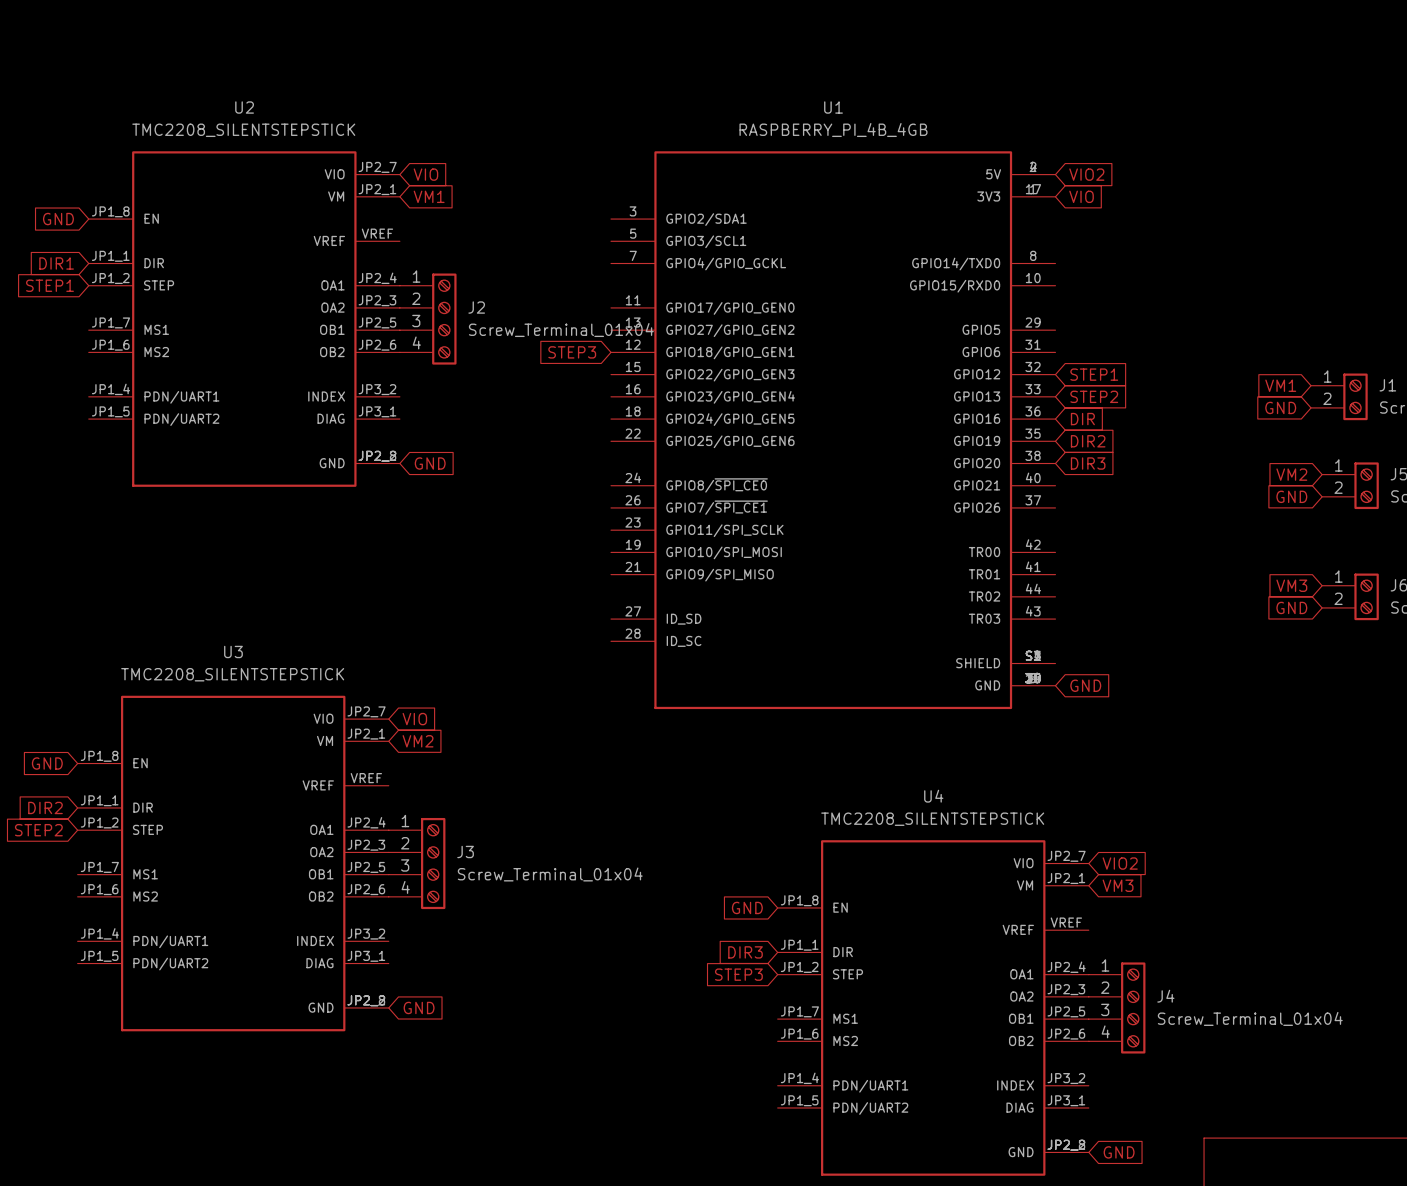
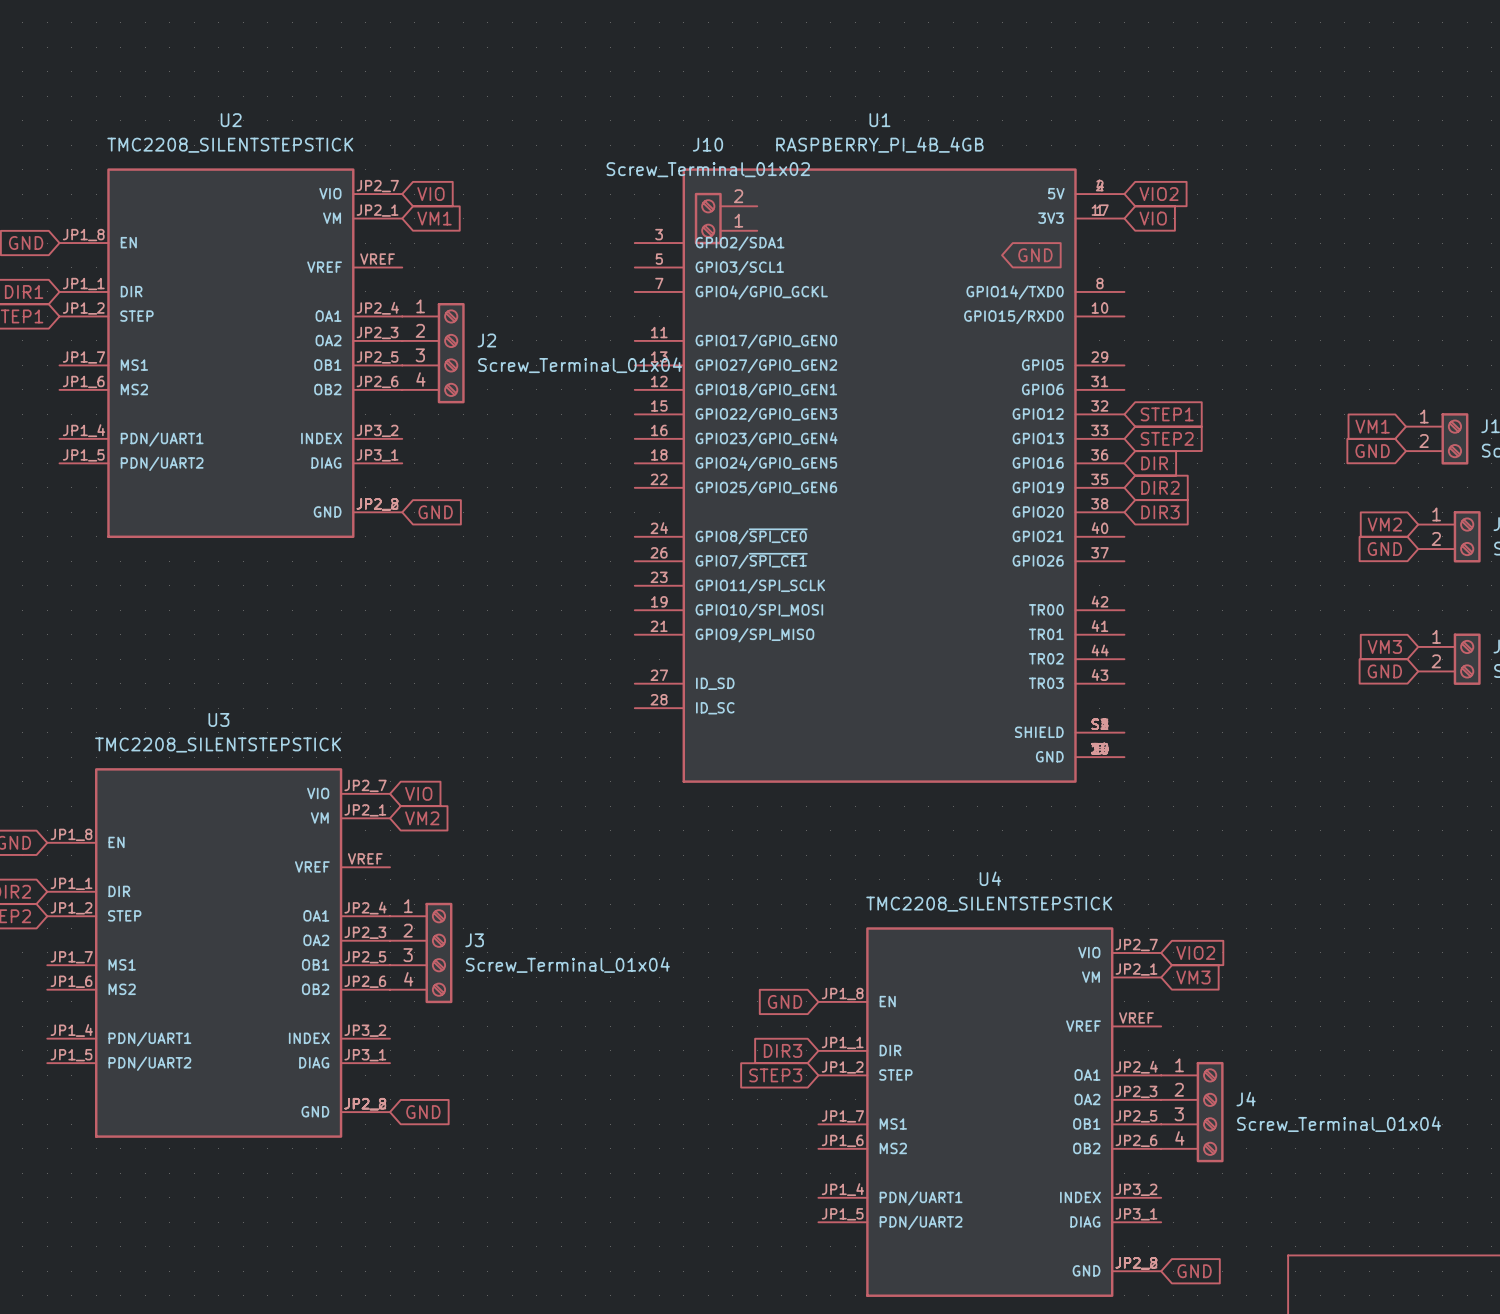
J10: none -> Screw_Terminal_01x02 (726, 218)
global label: none -> GND (1035, 255)
global label: STEP3 (572, 352) -> none
global label: GND (1085, 685) -> none

